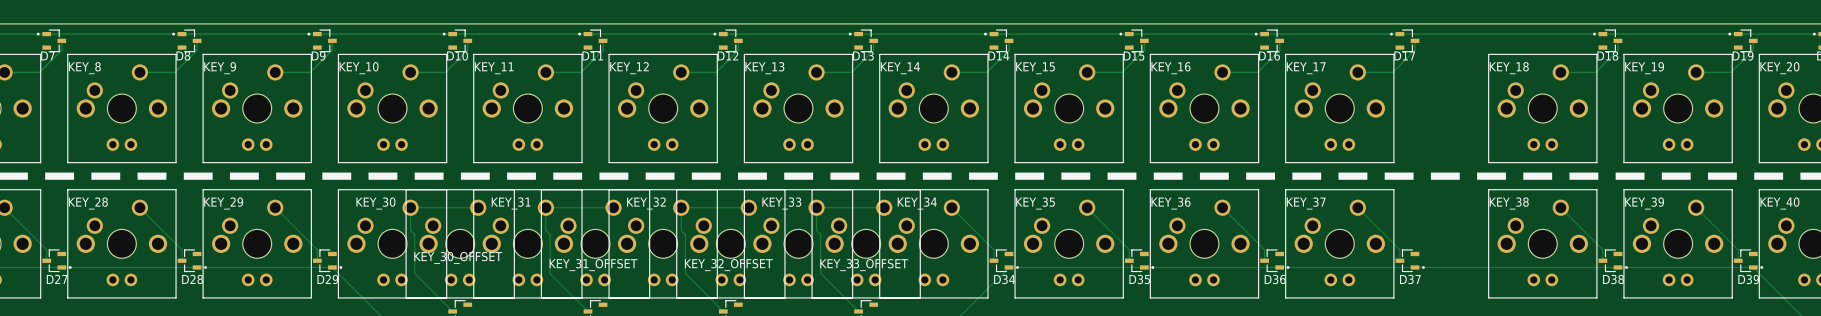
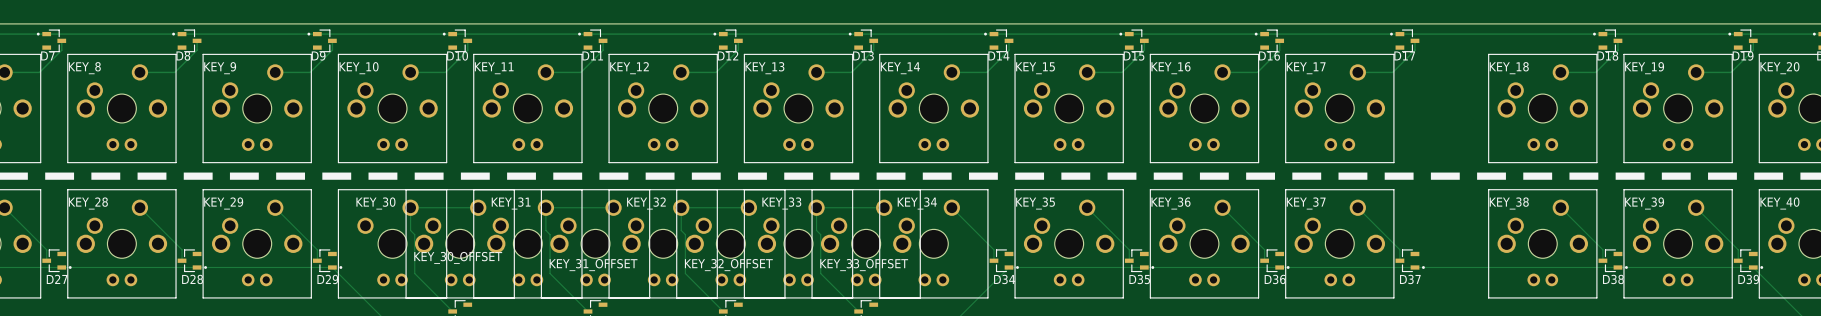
KEY_30 footprint: [337, 189, 448, 299] -> [337, 189, 448, 299]
KEY_30_OFFSET footprint: [405, 189, 515, 299] -> [405, 189, 515, 299]
KEY_31 footprint: [473, 189, 583, 299] -> [473, 189, 583, 299]
KEY_31_OFFSET footprint: [540, 189, 651, 299] -> [540, 189, 651, 299]
KEY_32 footprint: [608, 189, 718, 299] -> [608, 189, 718, 299]
KEY_32_OFFSET footprint: [676, 189, 786, 299] -> [676, 189, 786, 299]
KEY_33 footprint: [743, 189, 854, 299] -> [743, 189, 854, 299]
KEY_33_OFFSET footprint: [811, 189, 921, 299] -> [811, 189, 921, 299]
KEY_34 footprint: [879, 189, 989, 299] -> [879, 189, 989, 299]

